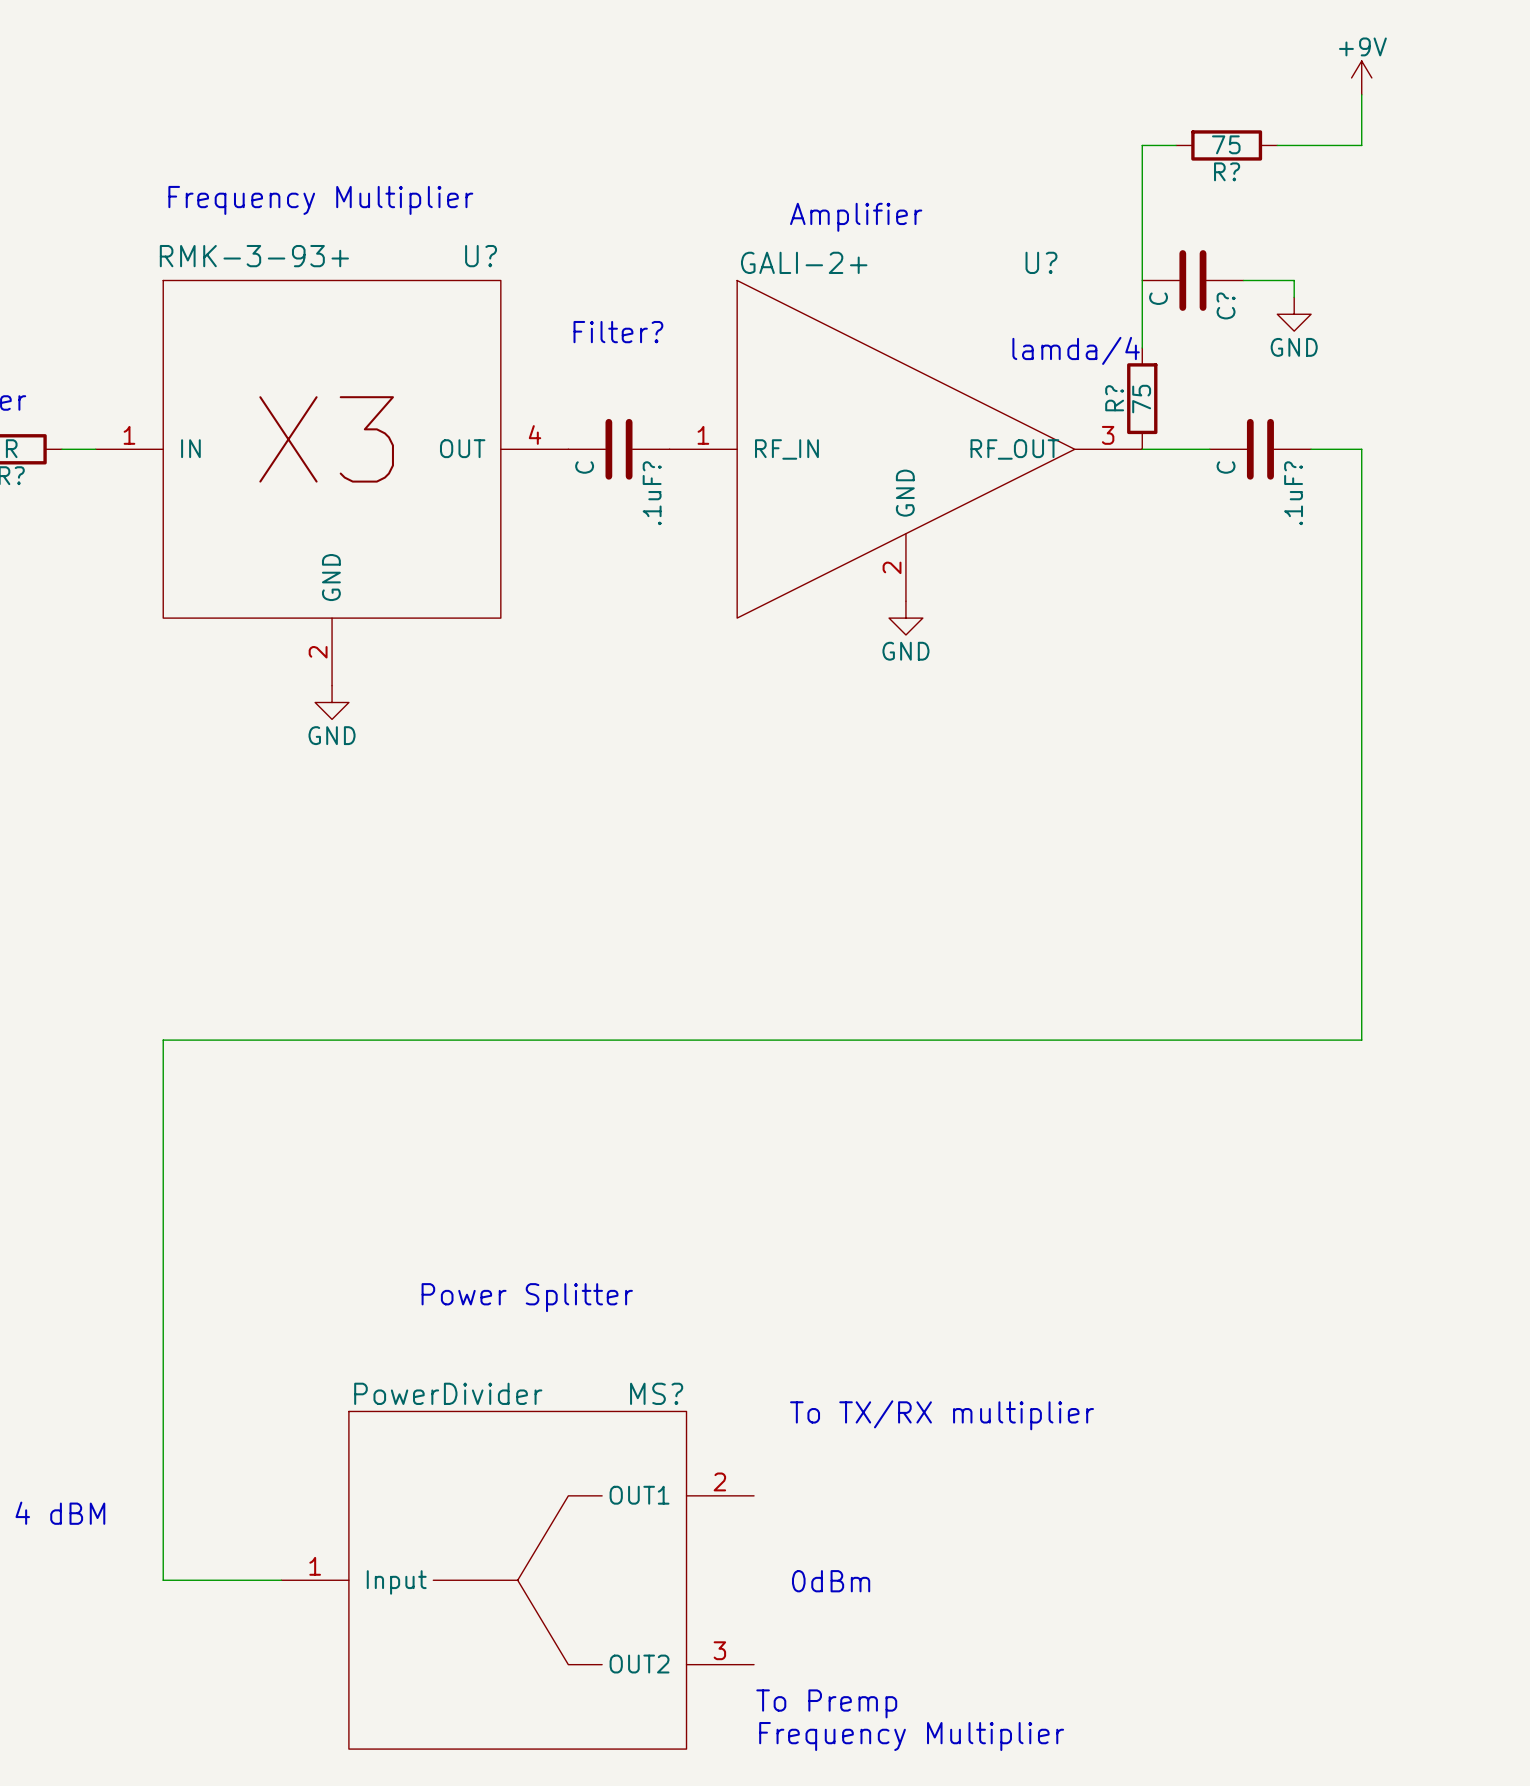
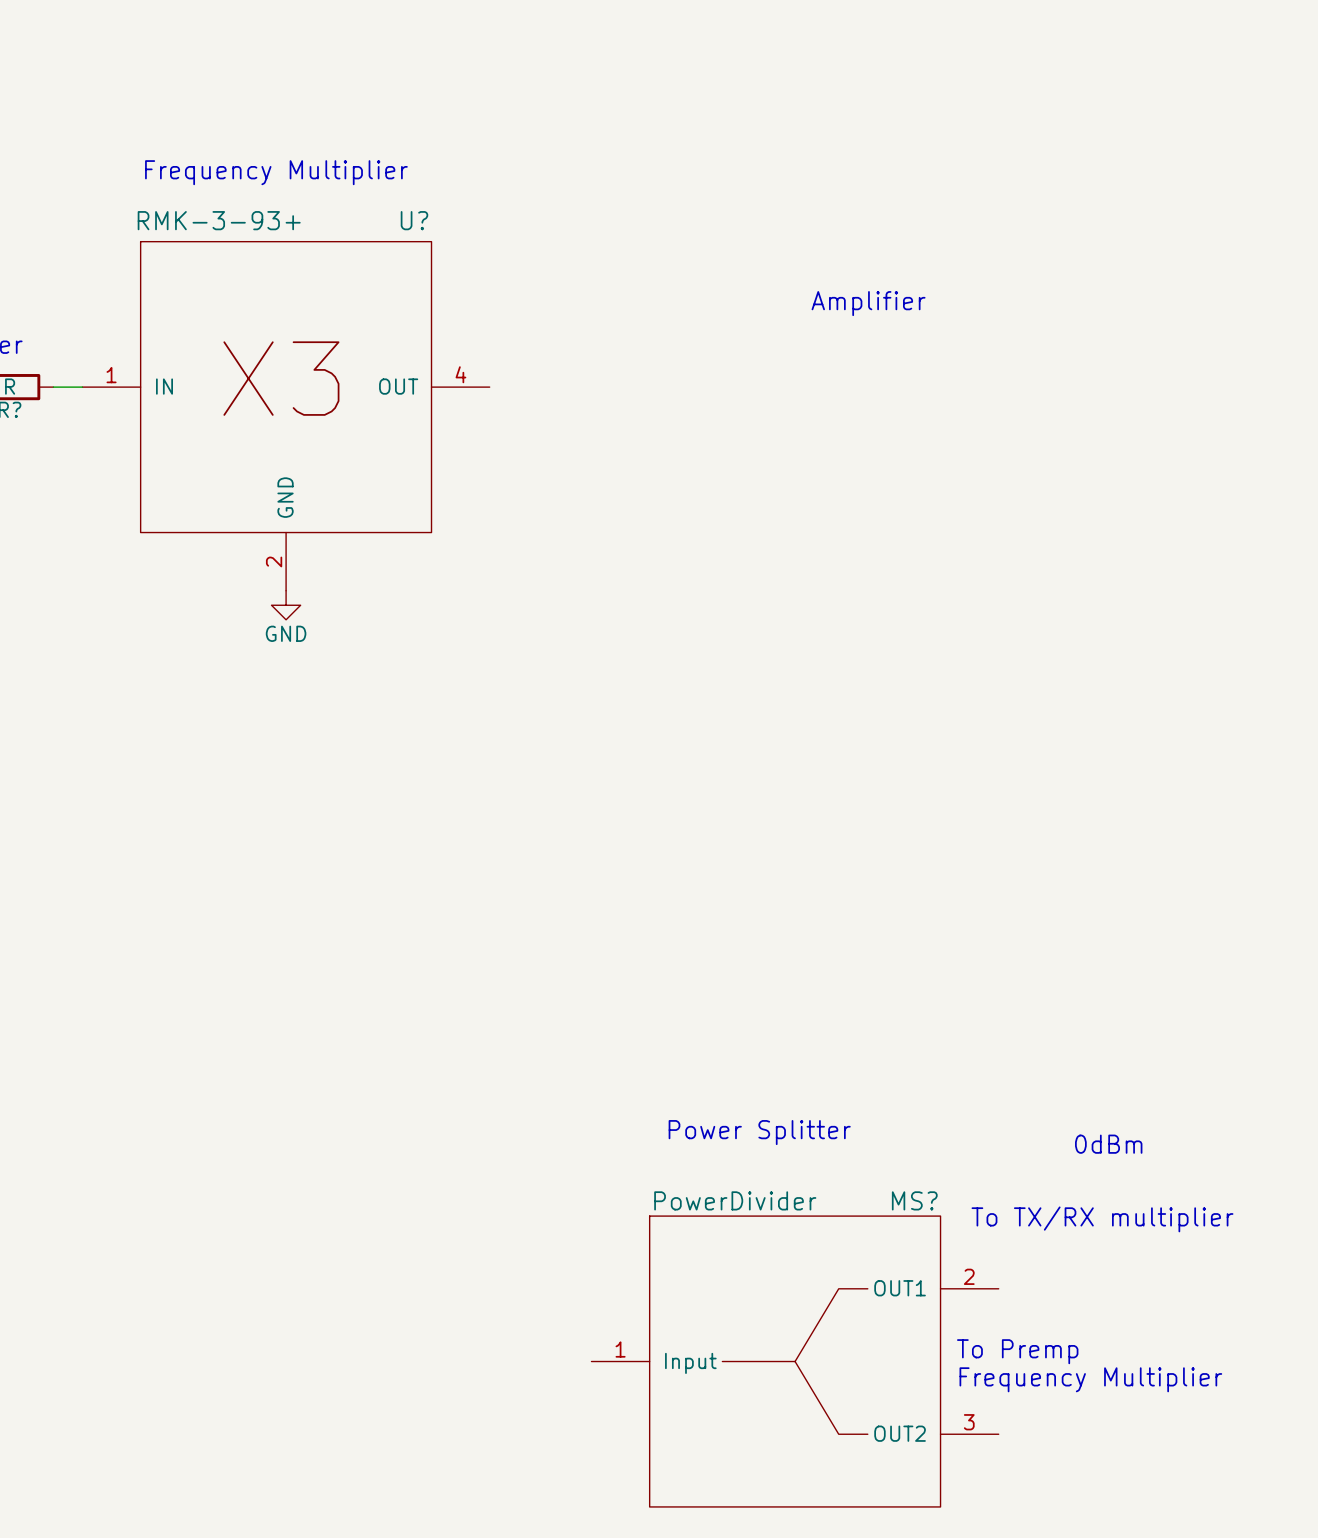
power symbol: +9V (1361, 77) -> none
wire: (1361, 94) (1361, 145) (1277, 145) -> none
wire: (1176, 145) (1142, 145) (1142, 348) -> none
R?: 75 (1226, 145) -> none
text position: Amplifier (856, 217) -> Amplifier (868, 303)
C?: C (1192, 280) -> none
wire: (1243, 280) (1294, 280) (1294, 297) -> none
power symbol: GND (1294, 314) -> none
text: Filter? (618, 332) -> none
text: lamda/4 (1076, 350) -> none
R?: 75 (1142, 398) -> none
.1uF?: C (618, 449) -> none
U?: GALI-2+ (905, 449) -> none
wire: (1142, 449) (1209, 449) -> none
.1uF?: C (1260, 449) -> none
wire: (1311, 449) (1361, 449) (1361, 1040) (163, 1040) (163, 1580) (281, 1580) -> none
power symbol: GND (905, 618) -> none
text: Power Splitter (527, 1297) -> none
text: none -> Power Splitter (759, 1132)
text: none -> 0dBm (1108, 1144)
text: To TX/RX multiplier (942, 1415) -> none
text: none -> To TX/RX multiplier (1102, 1219)
text: 4 dBM (60, 1513) -> none
text: none -> To Premp (1017, 1351)
MS?: PowerDivider (517, 1580) -> none
MS?: none -> PowerDivider (795, 1361)
text: 0dBm (831, 1581) -> none
text: none -> Frequency Multiplier (1090, 1379)
text: To Premp (826, 1703) -> none
text: Frequency Multiplier (911, 1736) -> none

